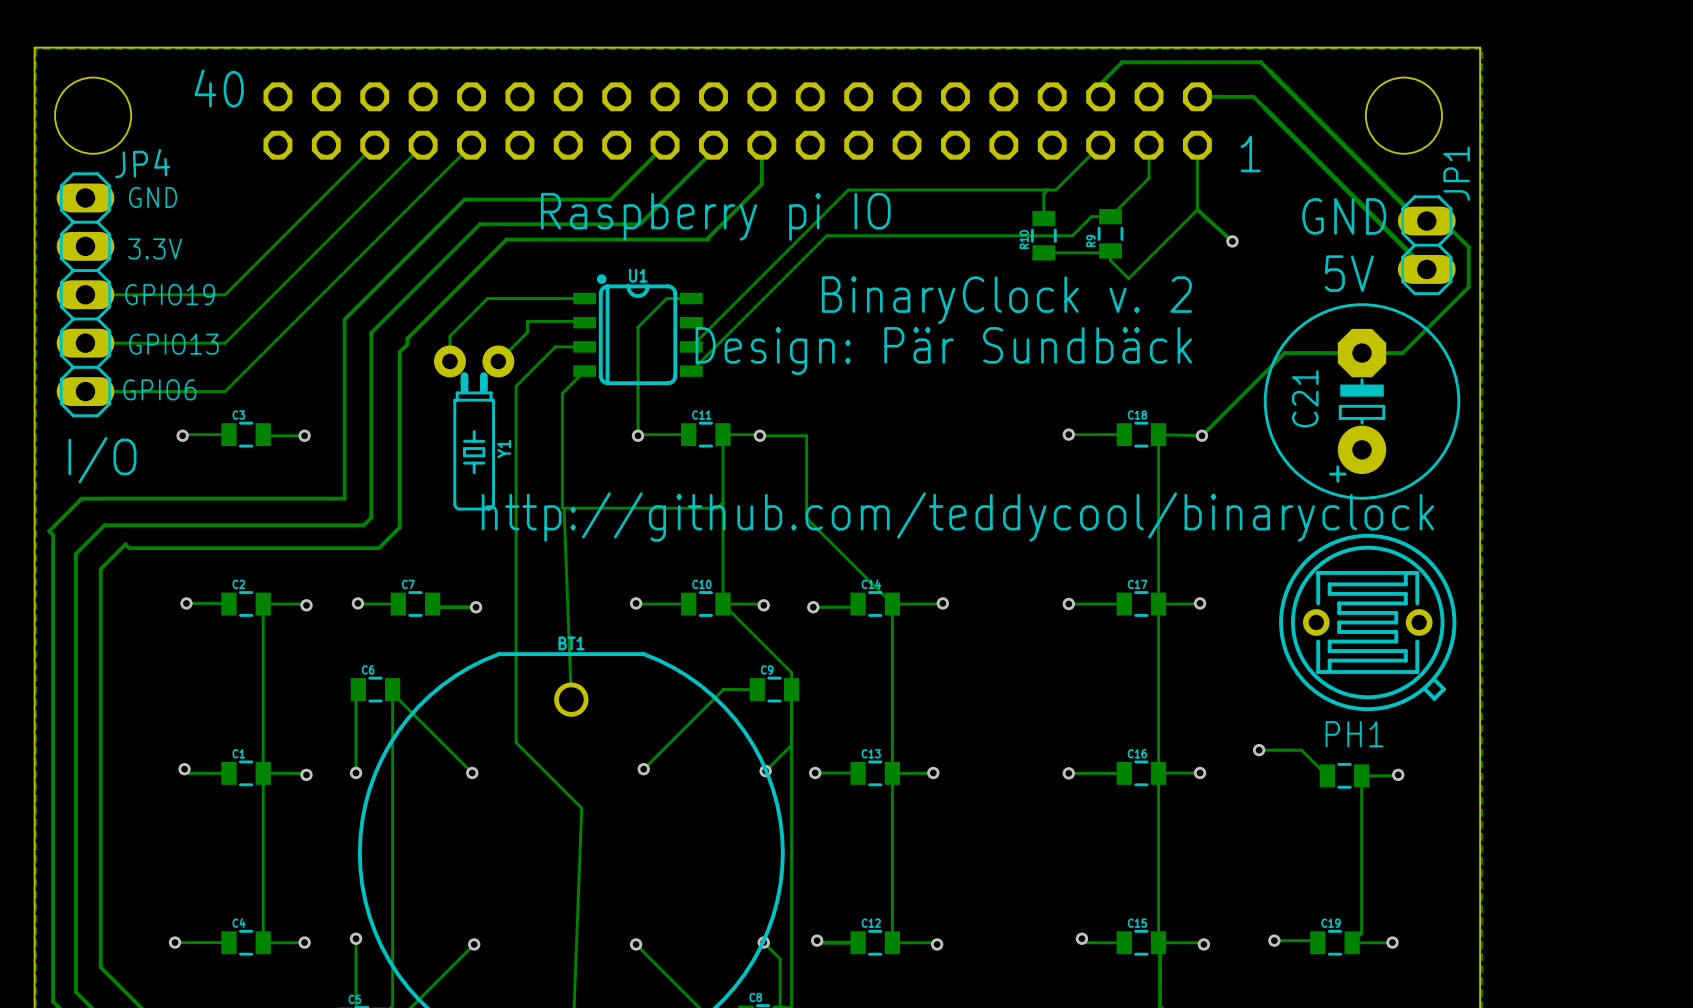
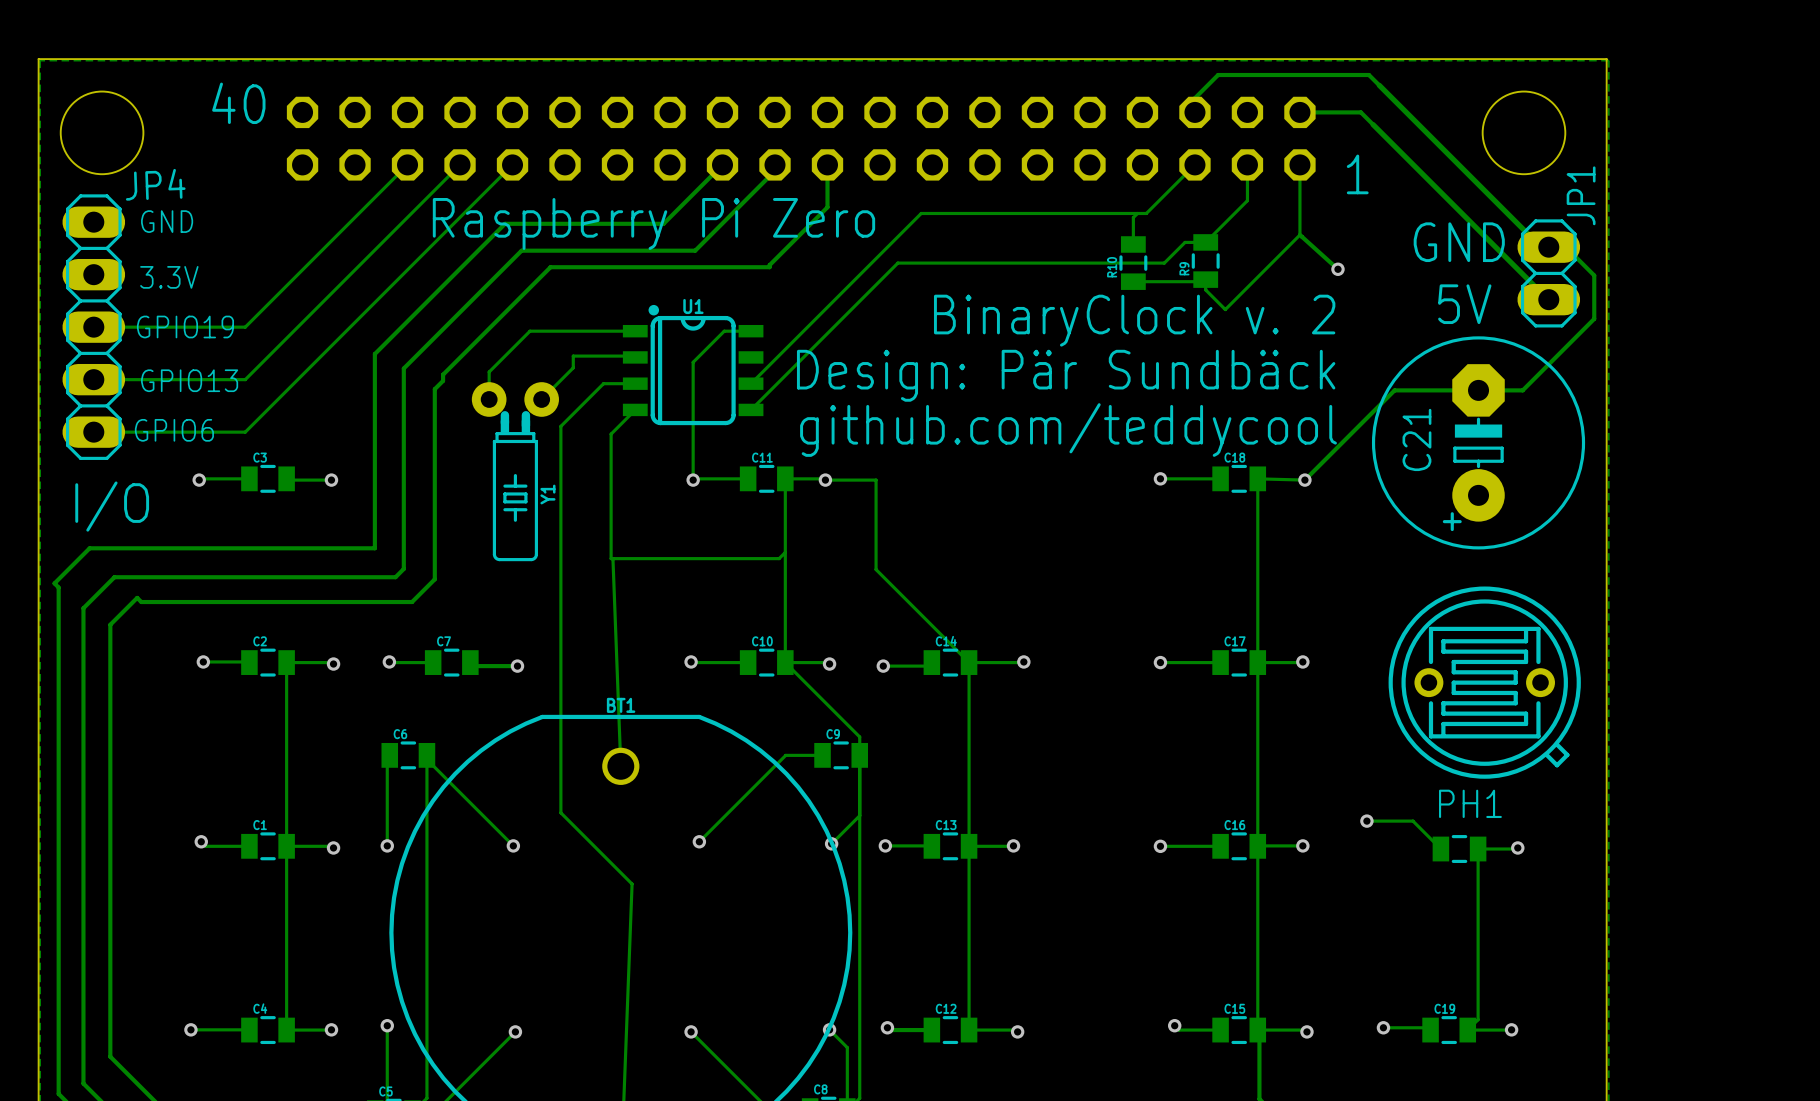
text: Raspberry pi IO (715, 216) -> Raspberry Pi Zero (653, 223)
text position: BinaryClock v. 2 (1006, 300) -> BinaryClock v. 2 (1134, 320)
text position: Design: Pär Sundbäck (943, 351) -> Design: Pär Sundbäck (1066, 375)
text: none -> github.com/teddycool (1068, 430)
text: http://github.com/teddycool/binaryclock (957, 517) -> none

